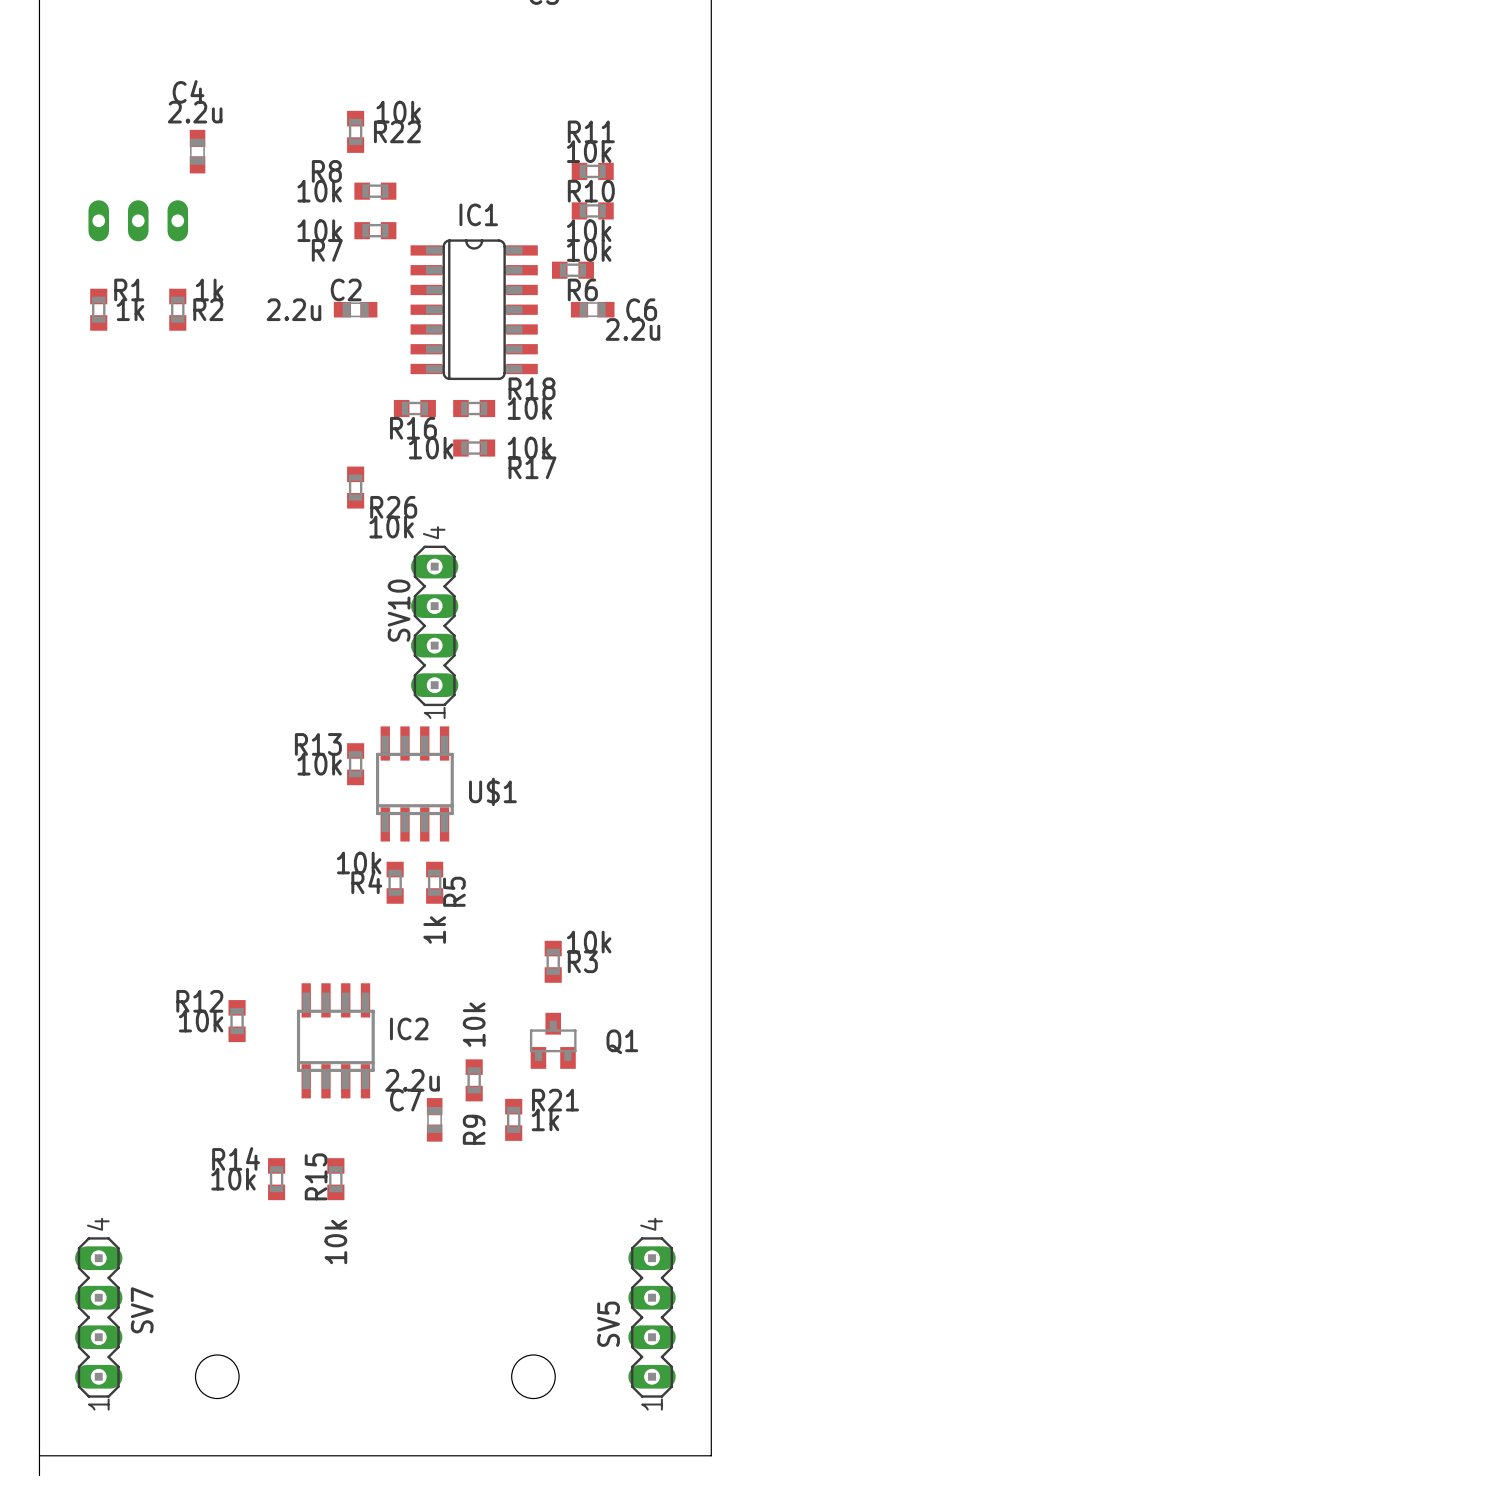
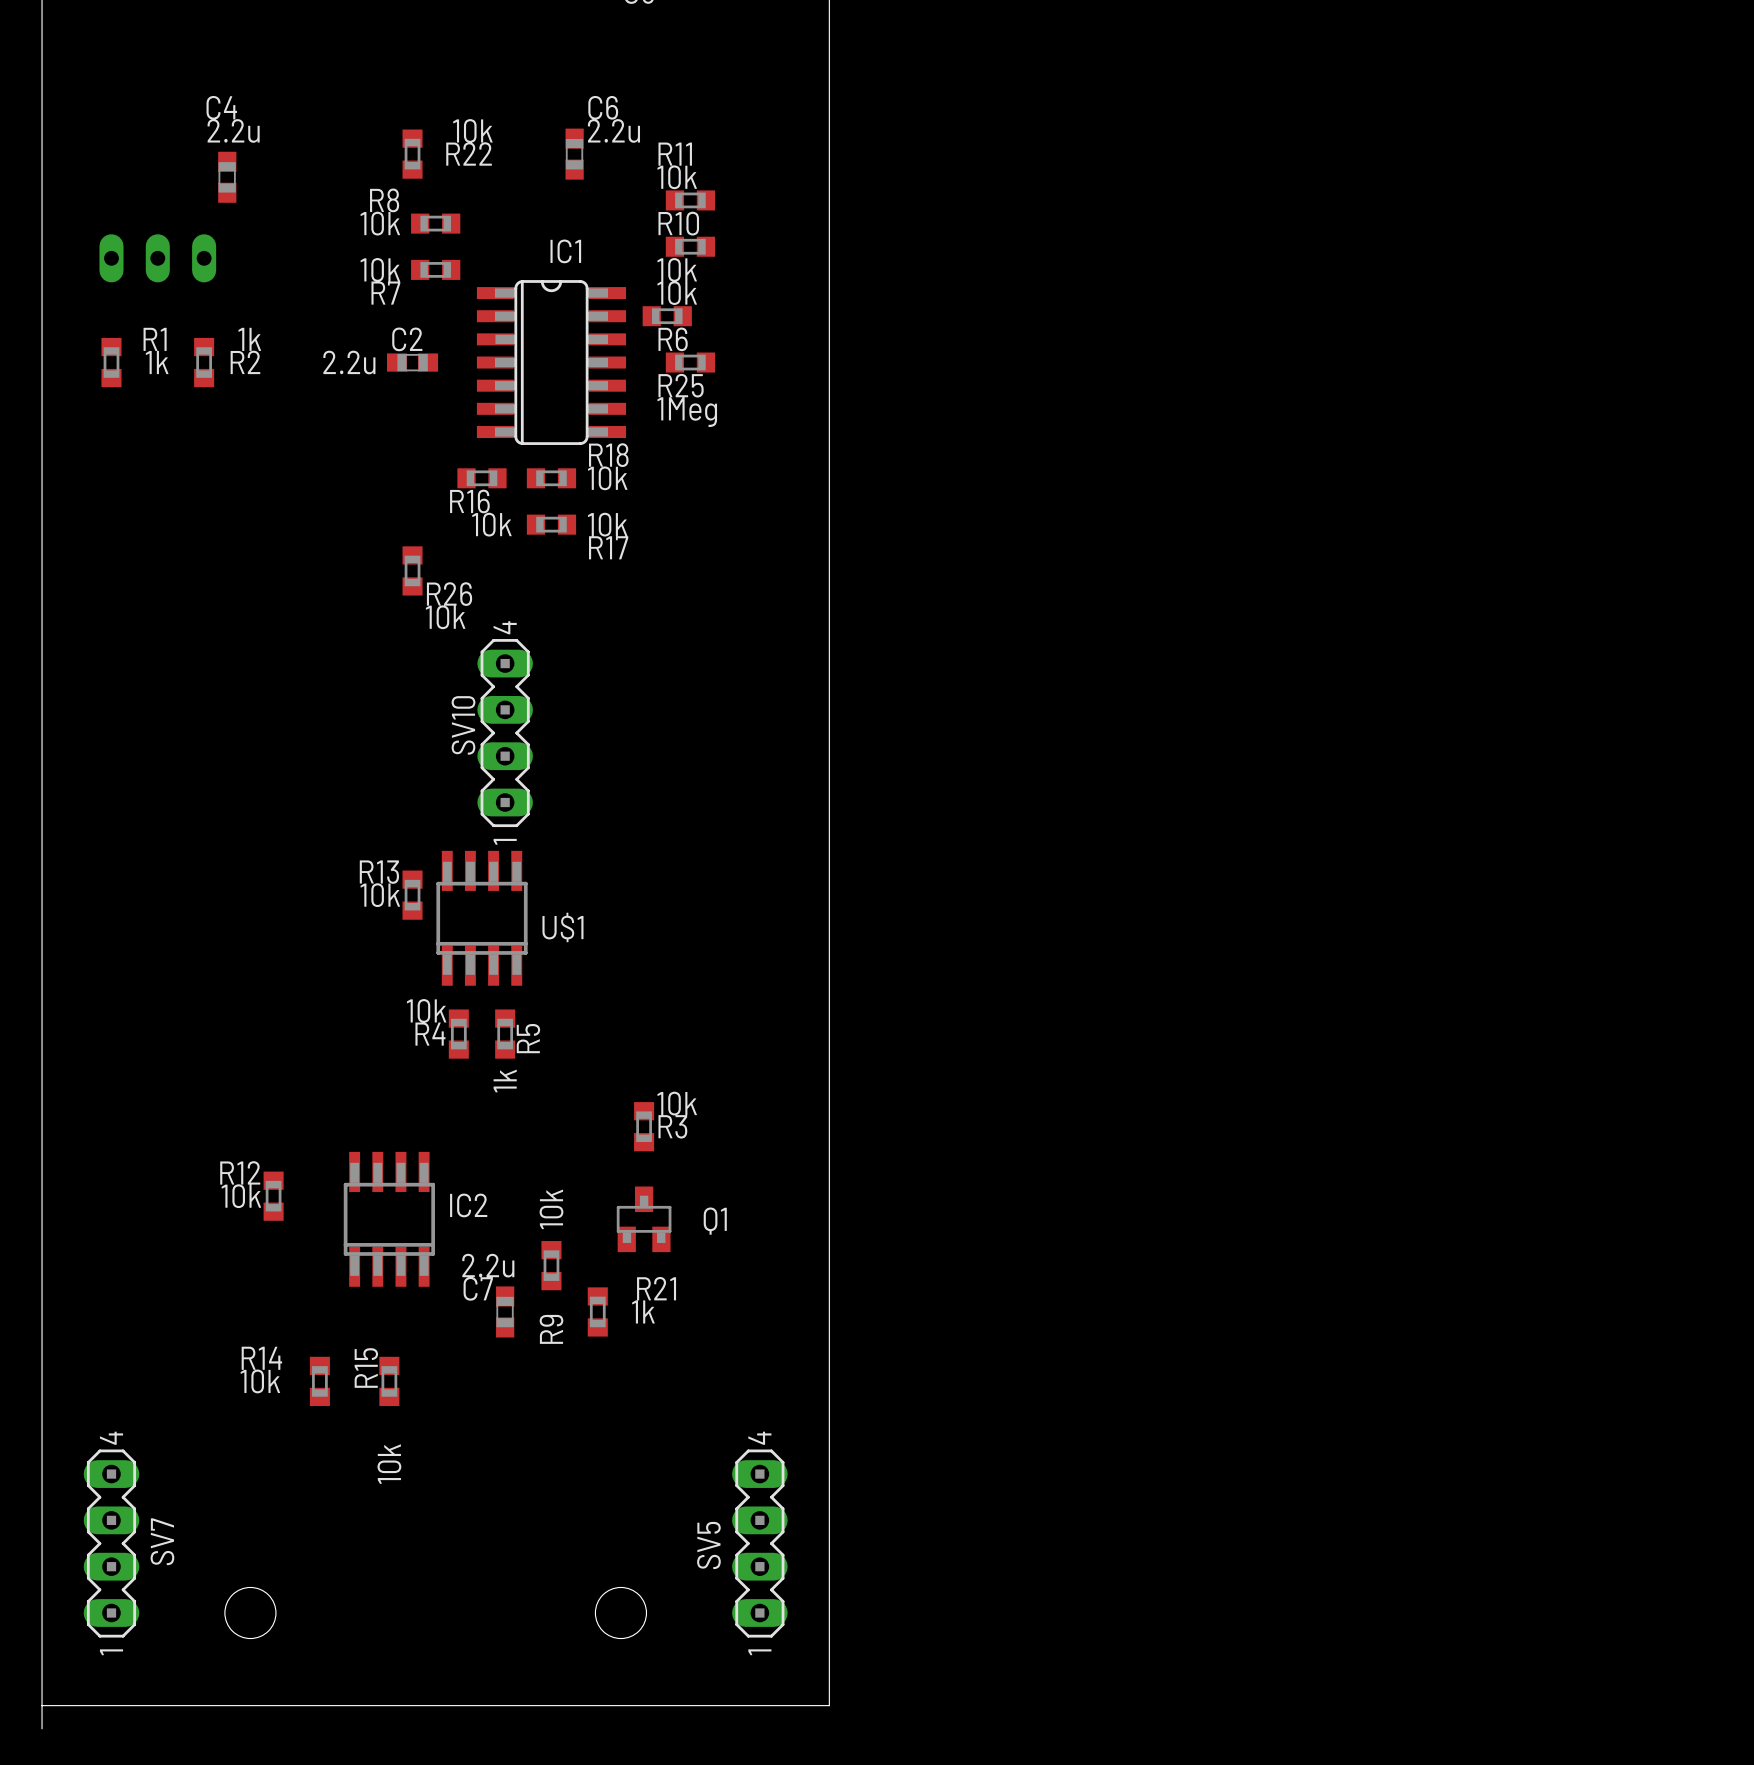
C6 rotation: 0° (592, 309) -> 90° clockwise (574, 154)
C6 position: (592, 309) -> (574, 154)
R25: none -> 1Meg (690, 362)
C6 name position: C6 (641, 309) -> C6 (603, 107)
C6 value position: 2.2u (632, 329) -> 2.2u (613, 130)

